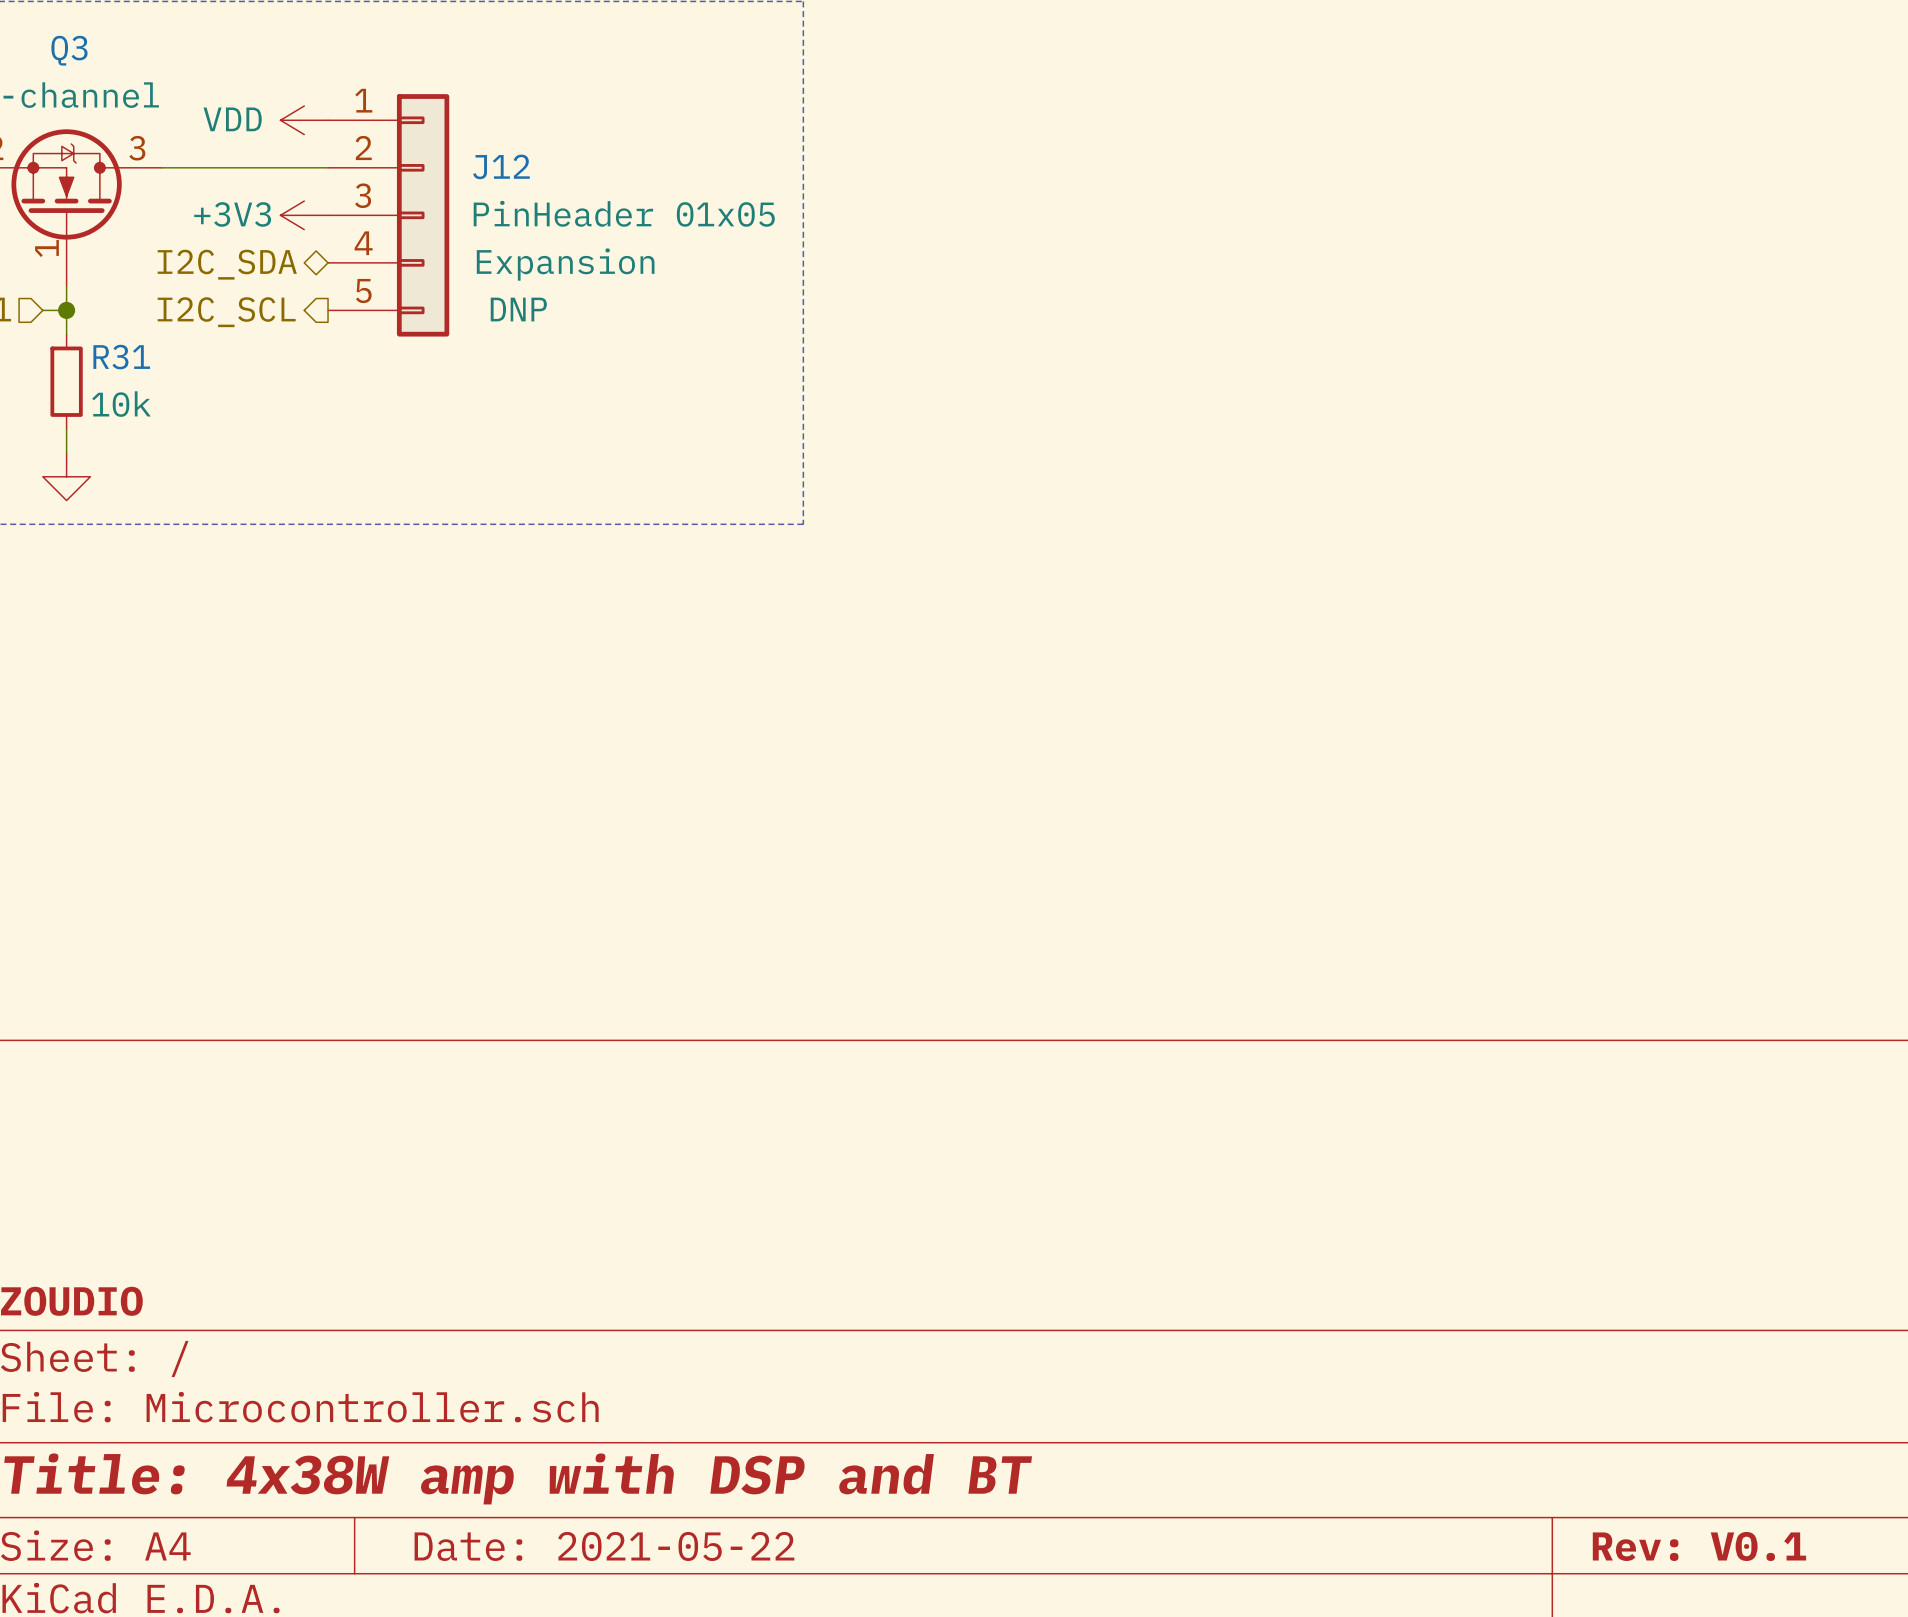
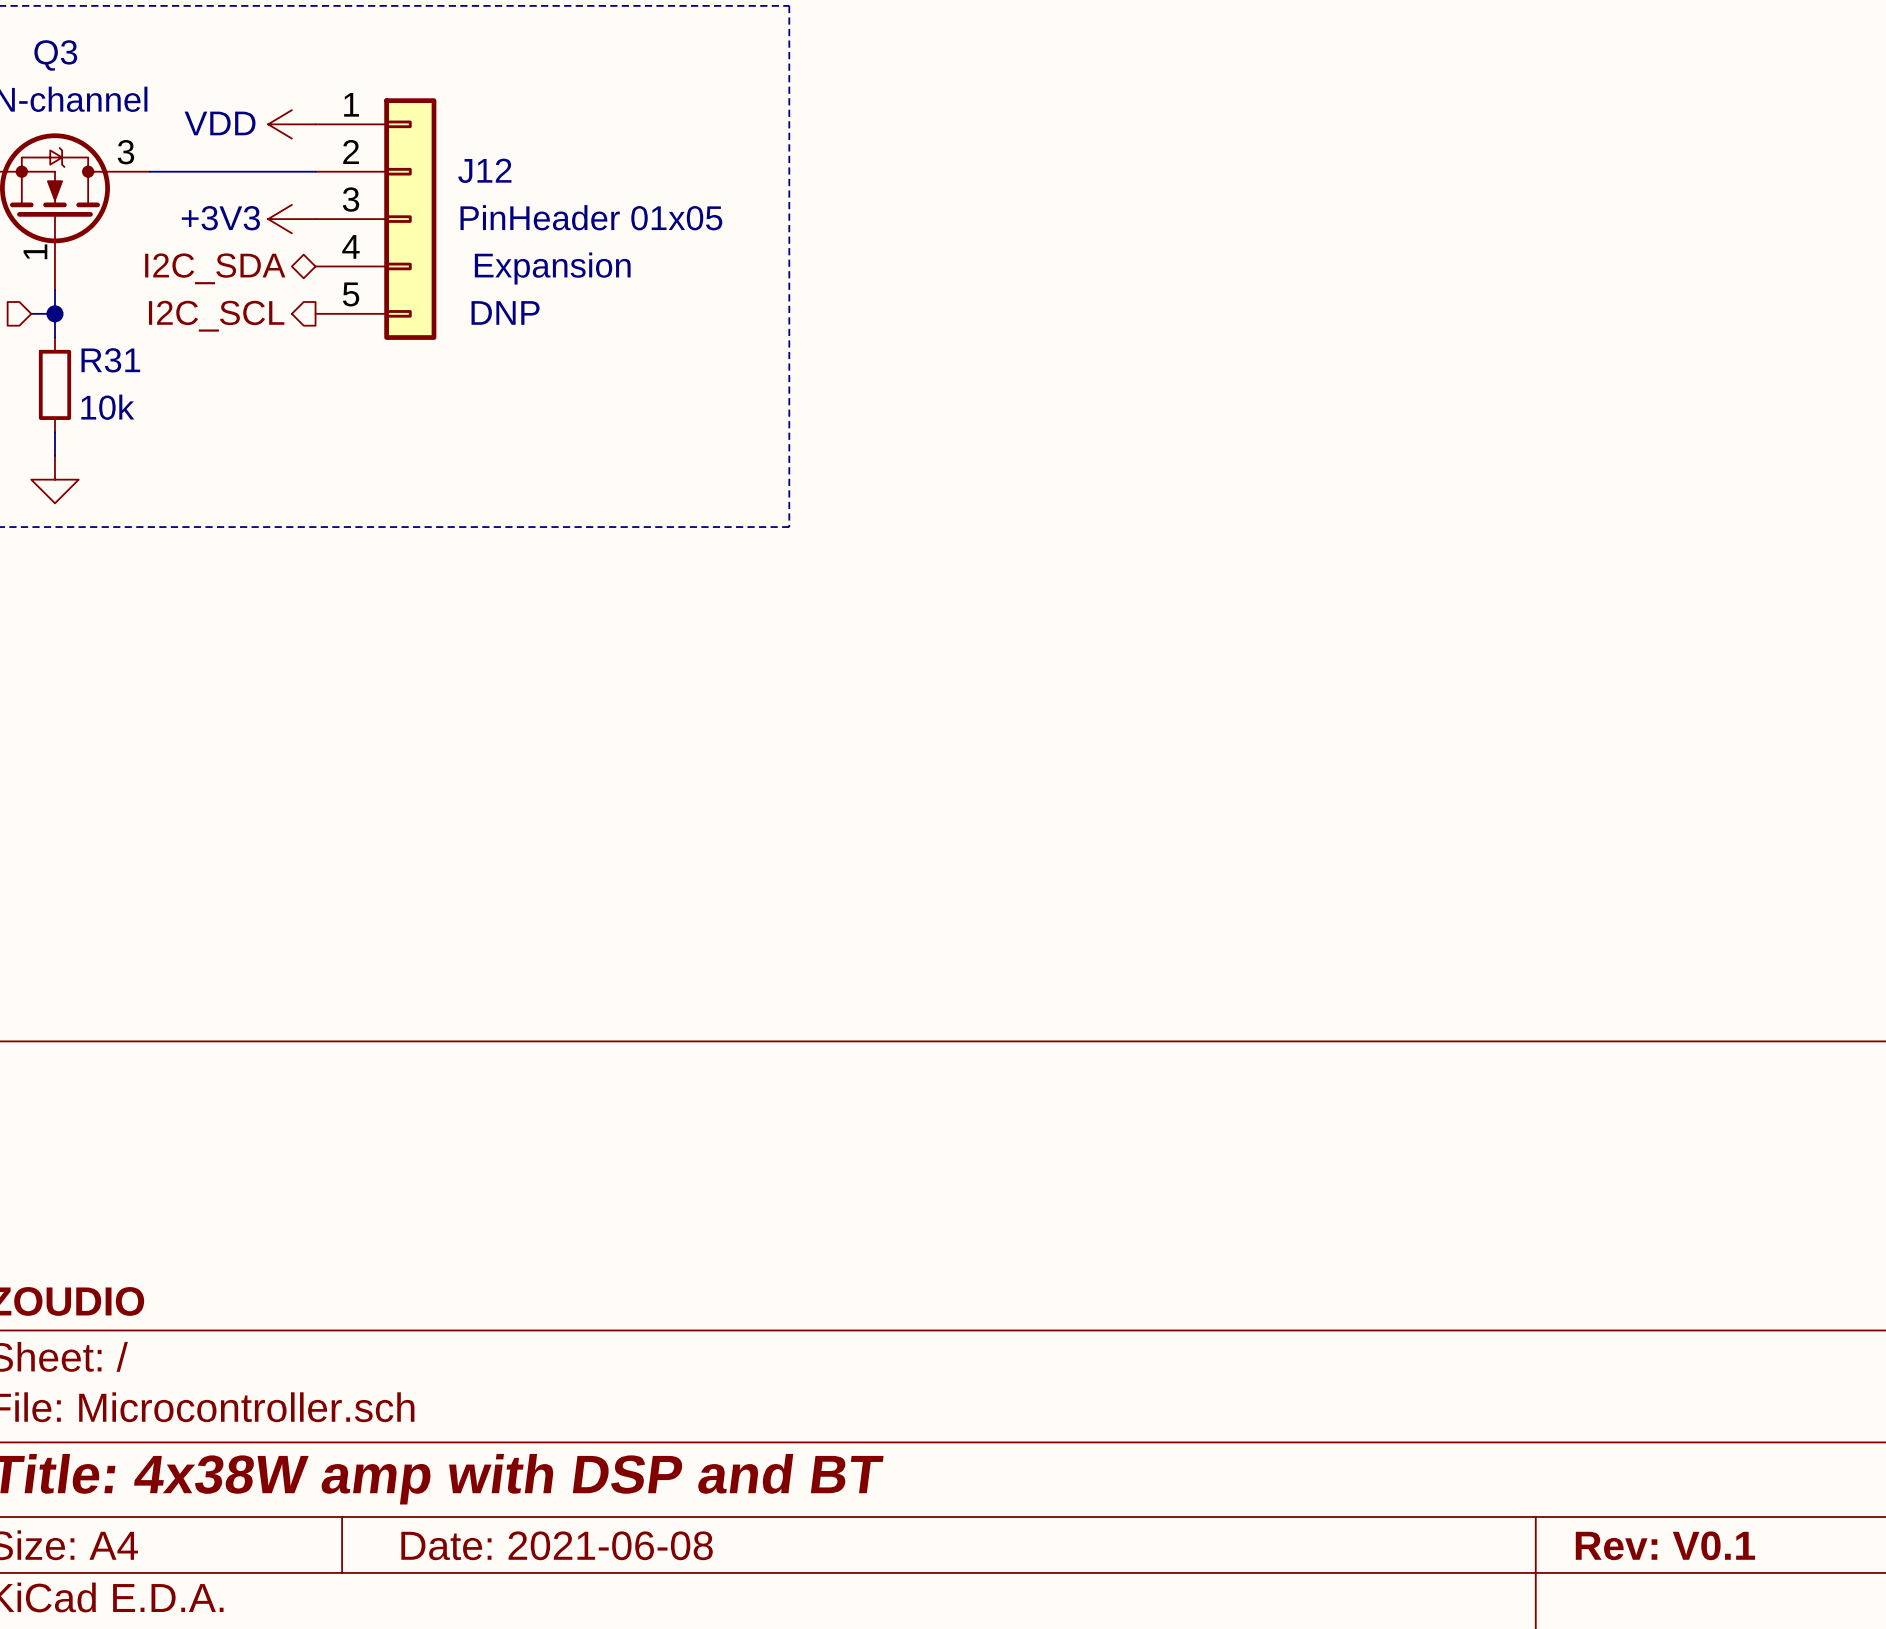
title block: Date: 2021-05-22 (604, 1546) -> Date: 2021-06-08 (557, 1545)

